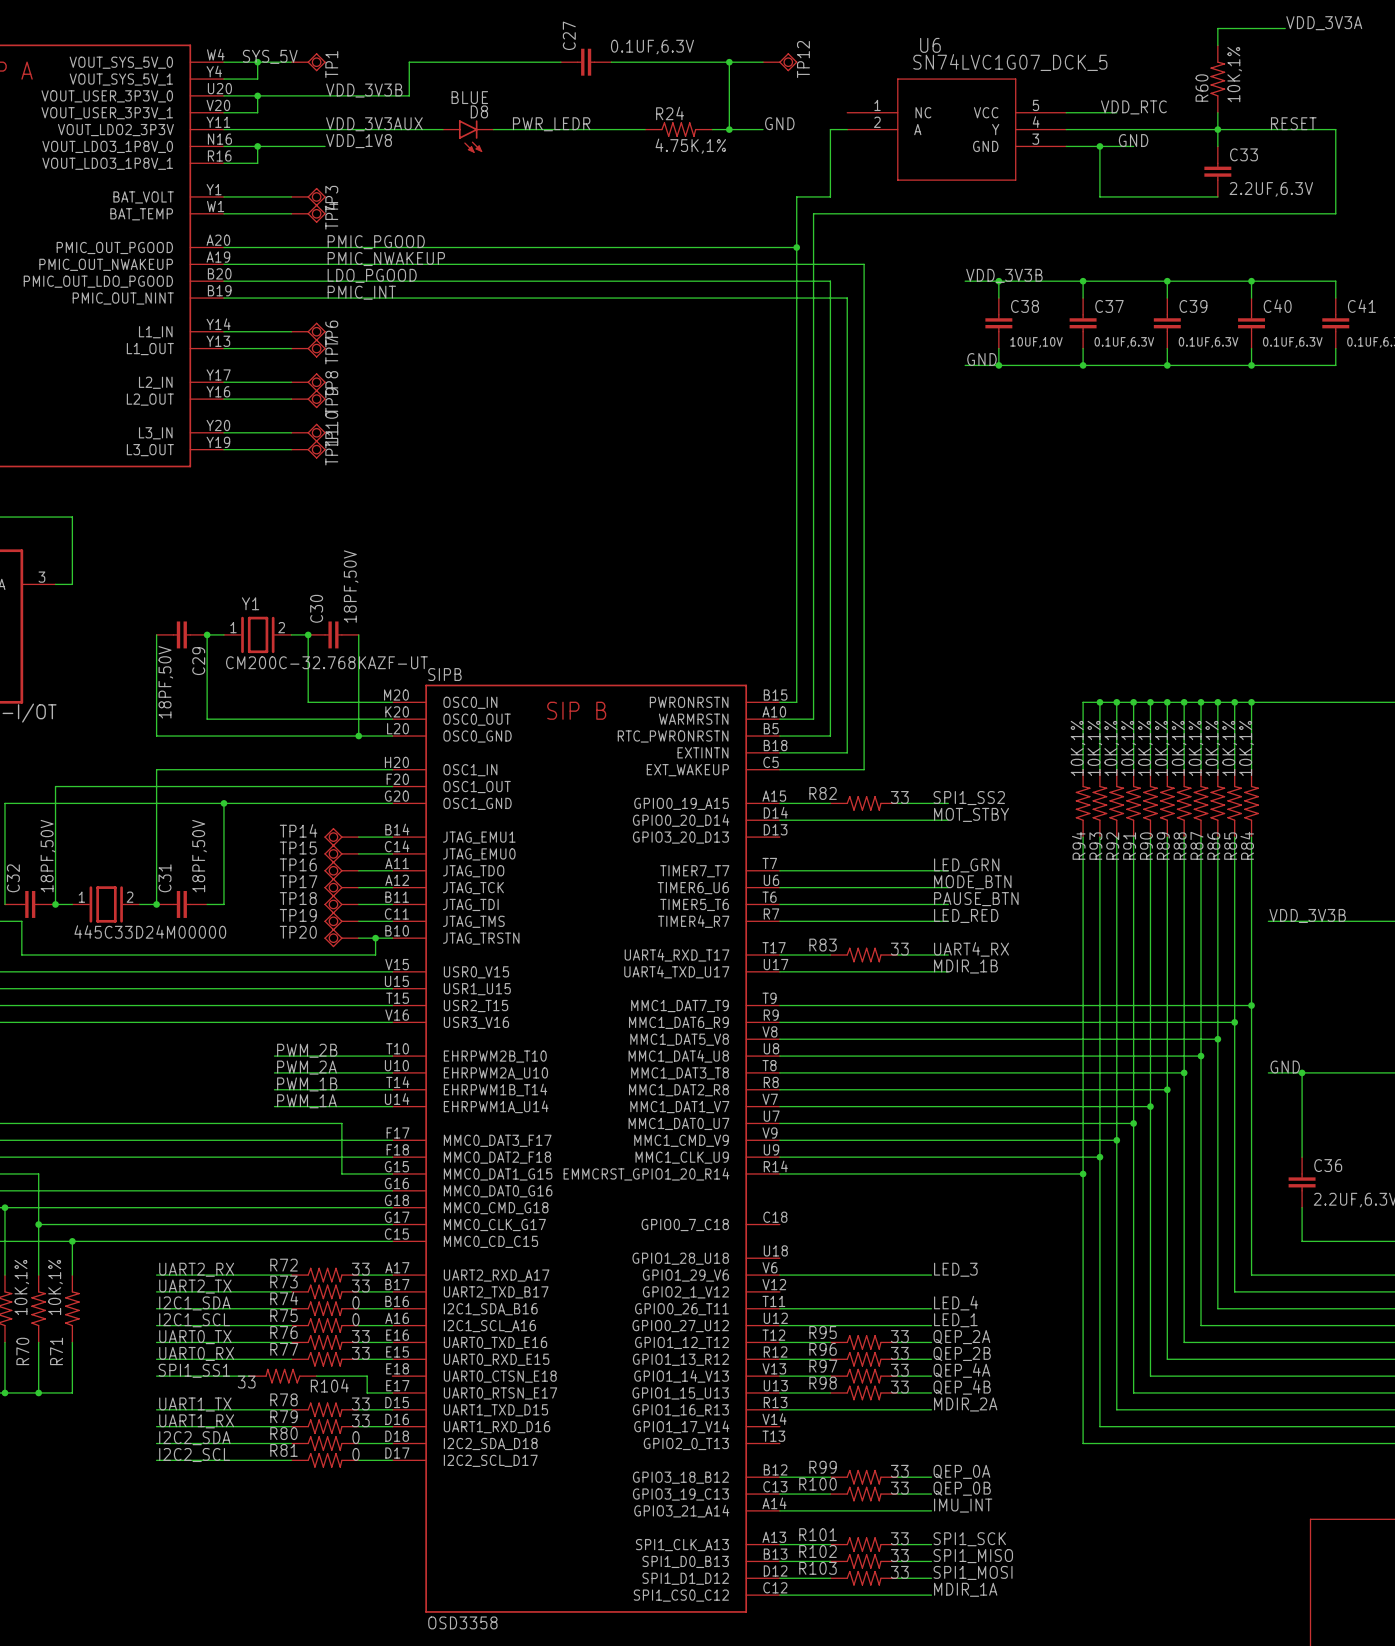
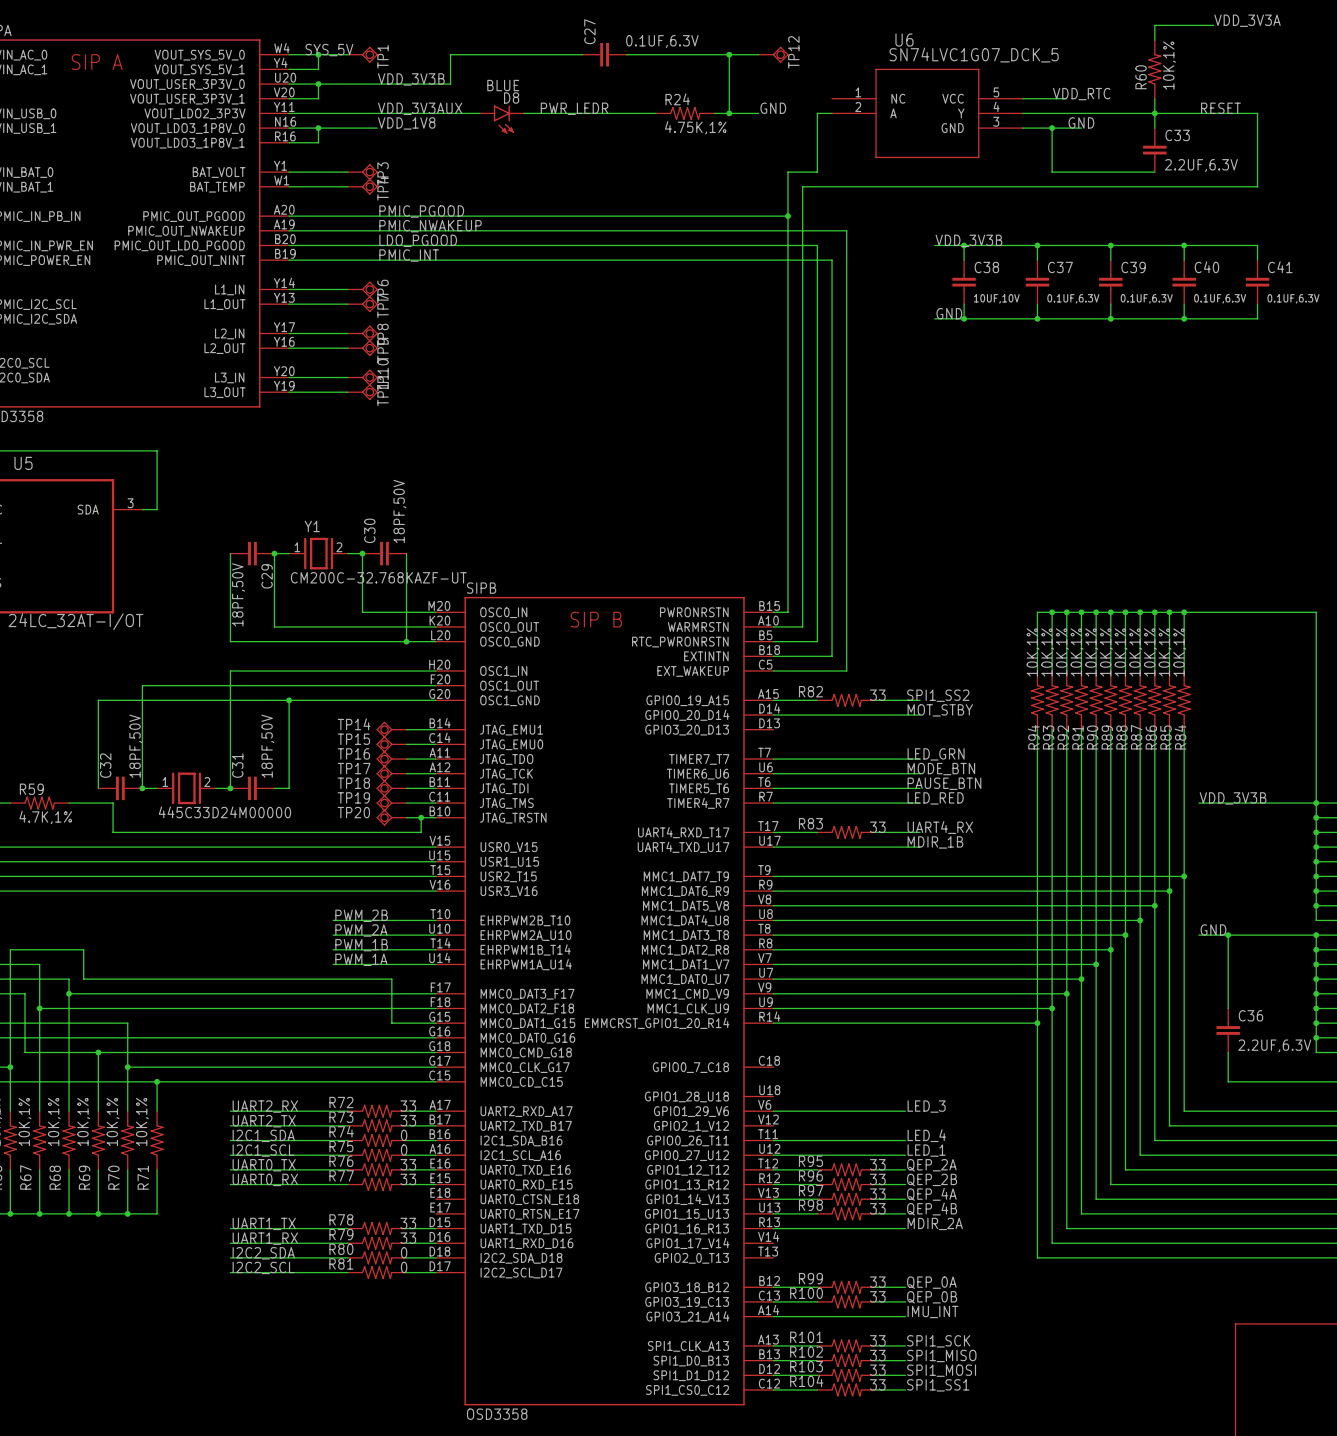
label: SPI1_SS1 (194, 1370) -> none
wire: (156, 1376) (249, 1376) -> none
R104 rotation: 0° (282, 1376) -> 180° (846, 1389)
R104 position: (282, 1376) -> (846, 1389)
wire: (316, 1376) (367, 1376) (367, 1392) (392, 1392) -> none
label: MDIR_1A (965, 1589) -> SPI1_SS1 (938, 1385)

